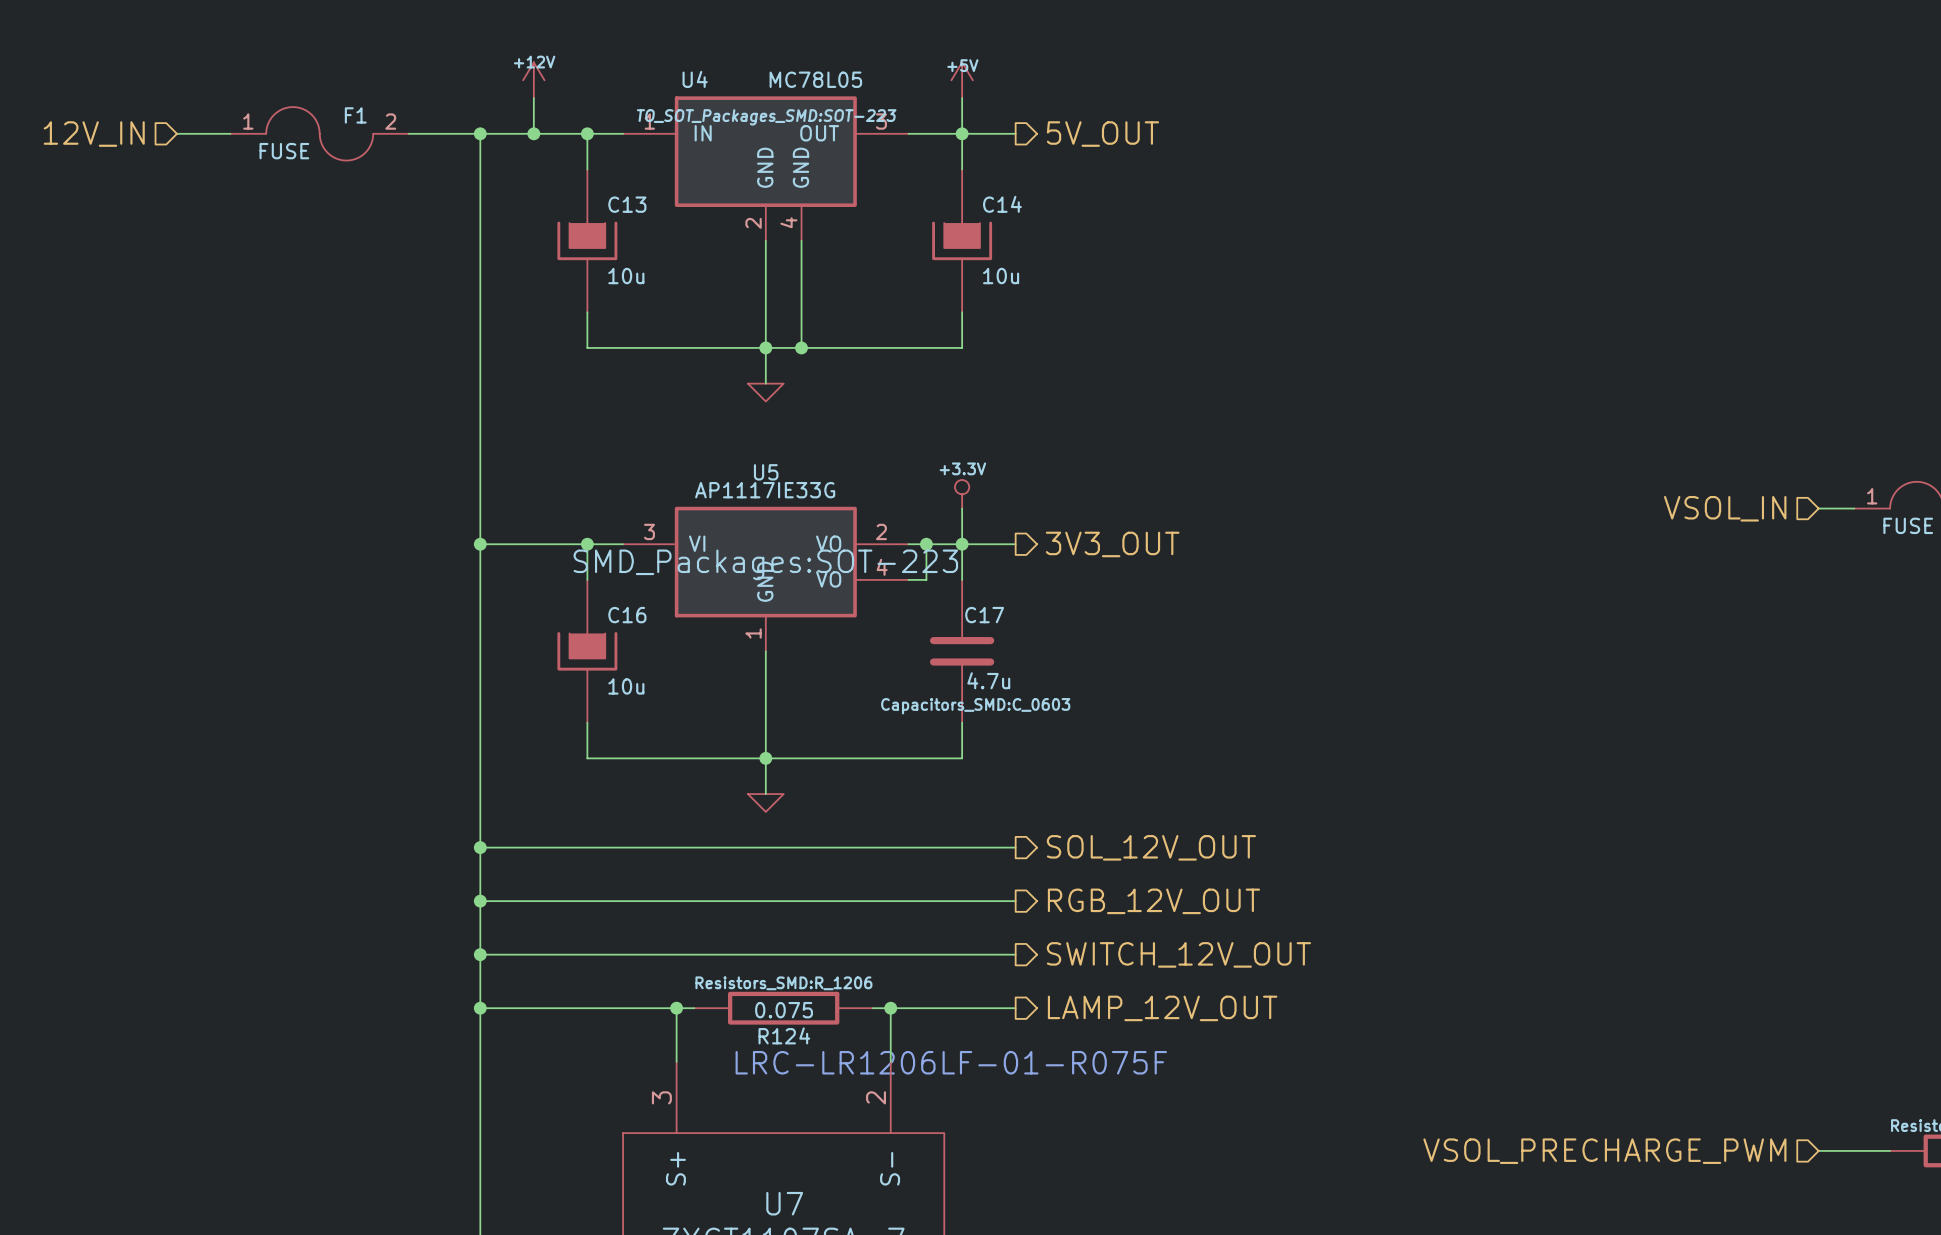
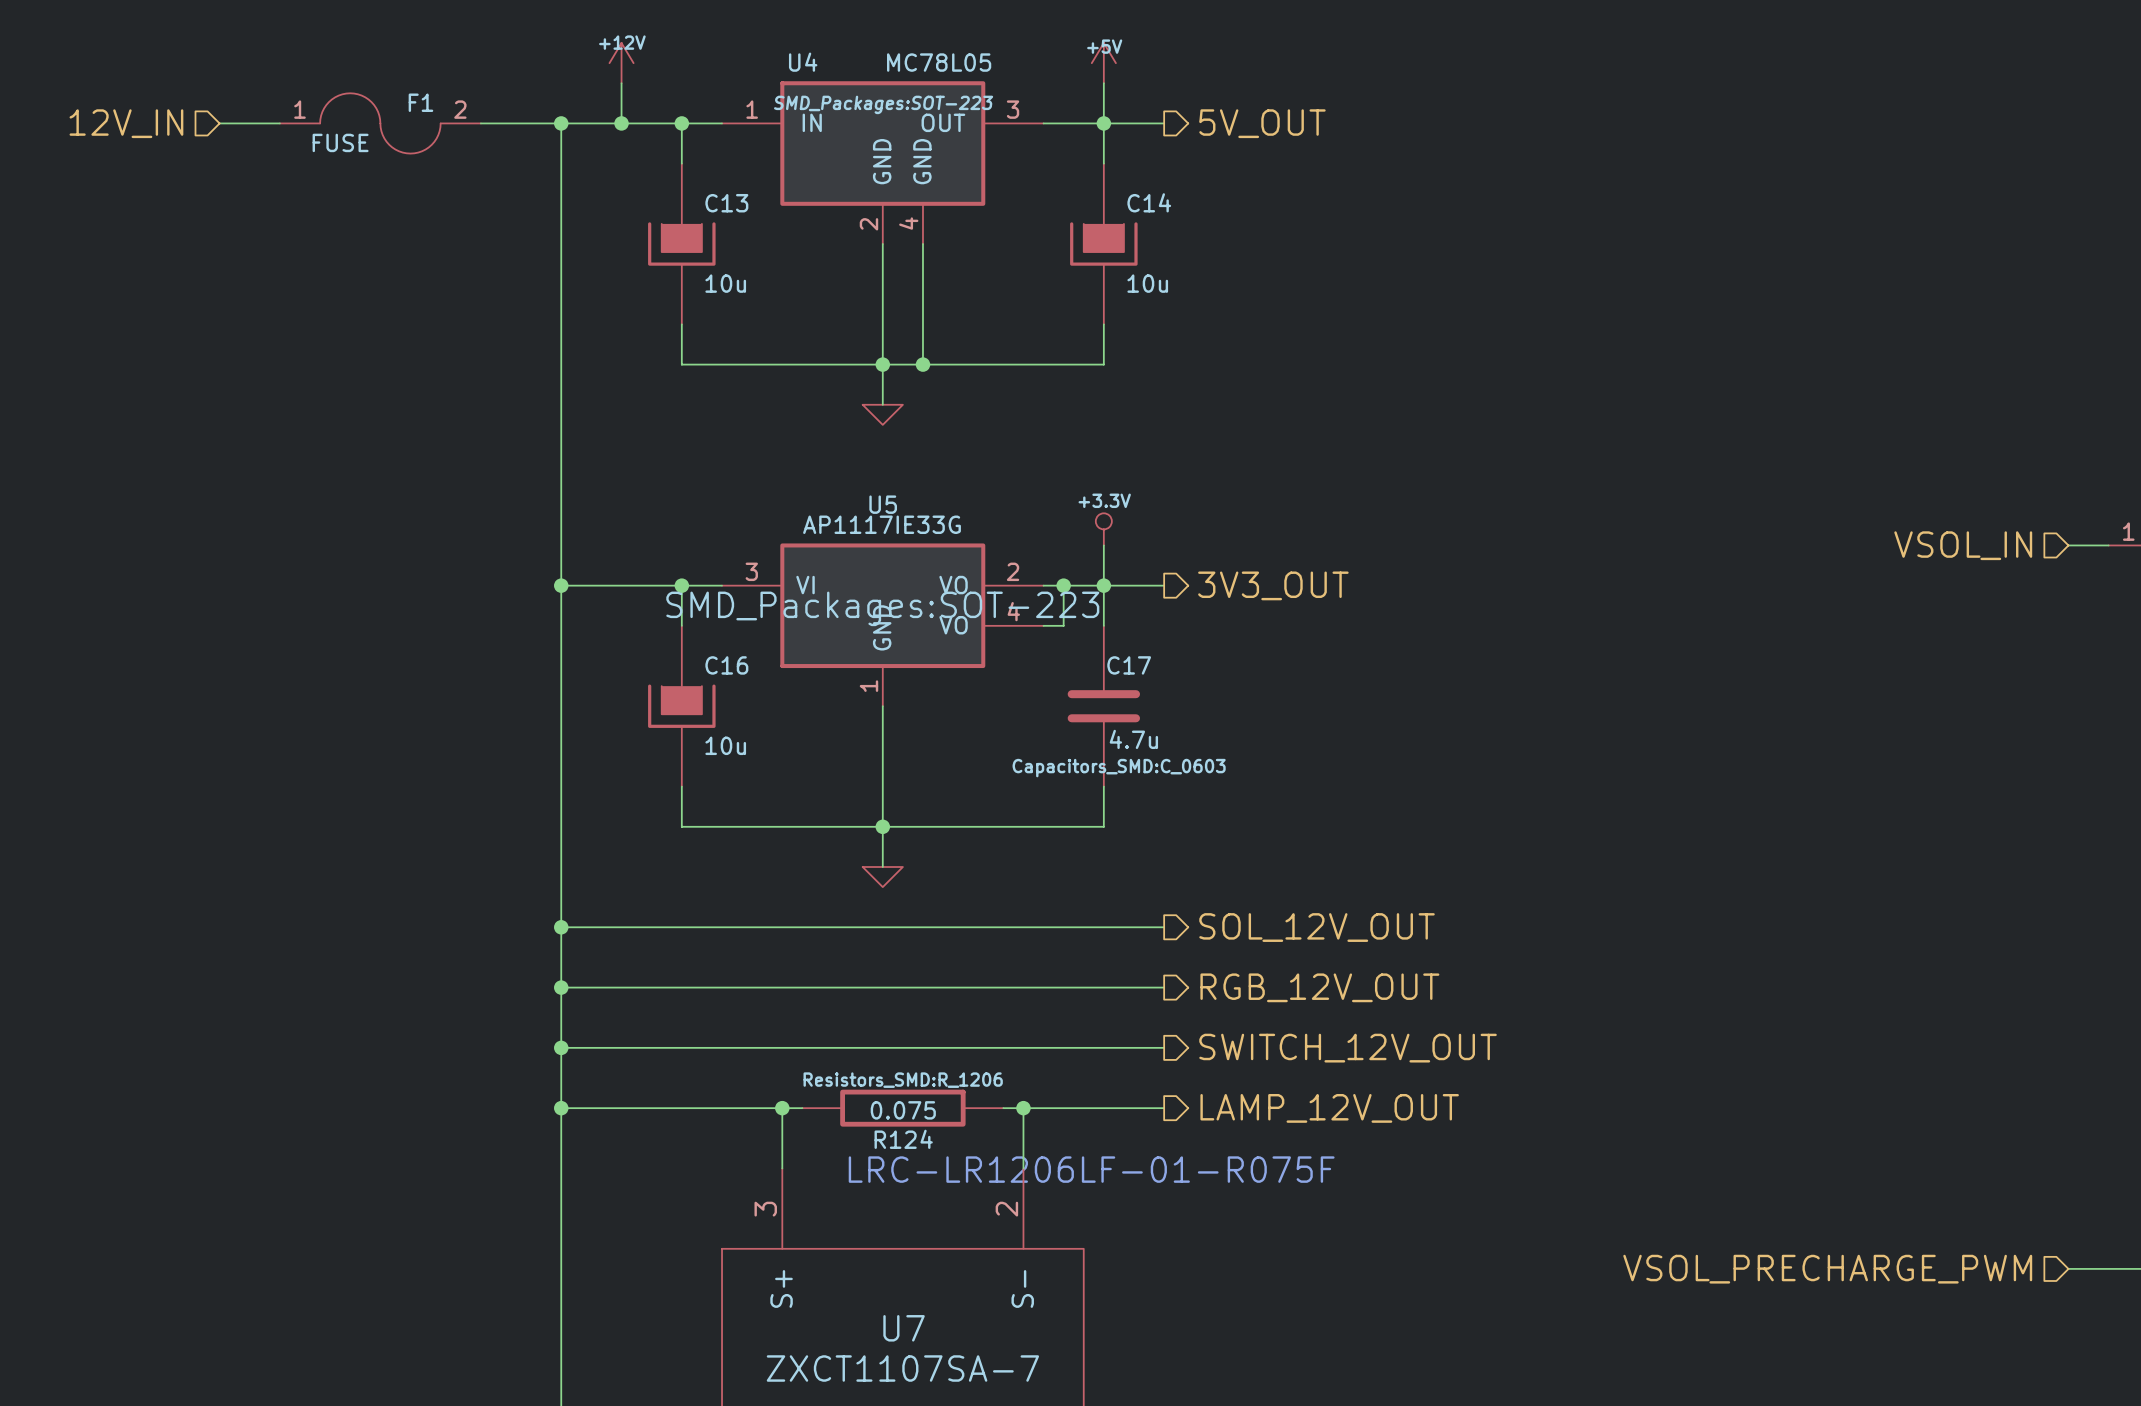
U4 text: TO_SOT_Packages_SMD:SOT-223 (766, 117) -> SMD_Packages:SOT-223 (883, 104)

